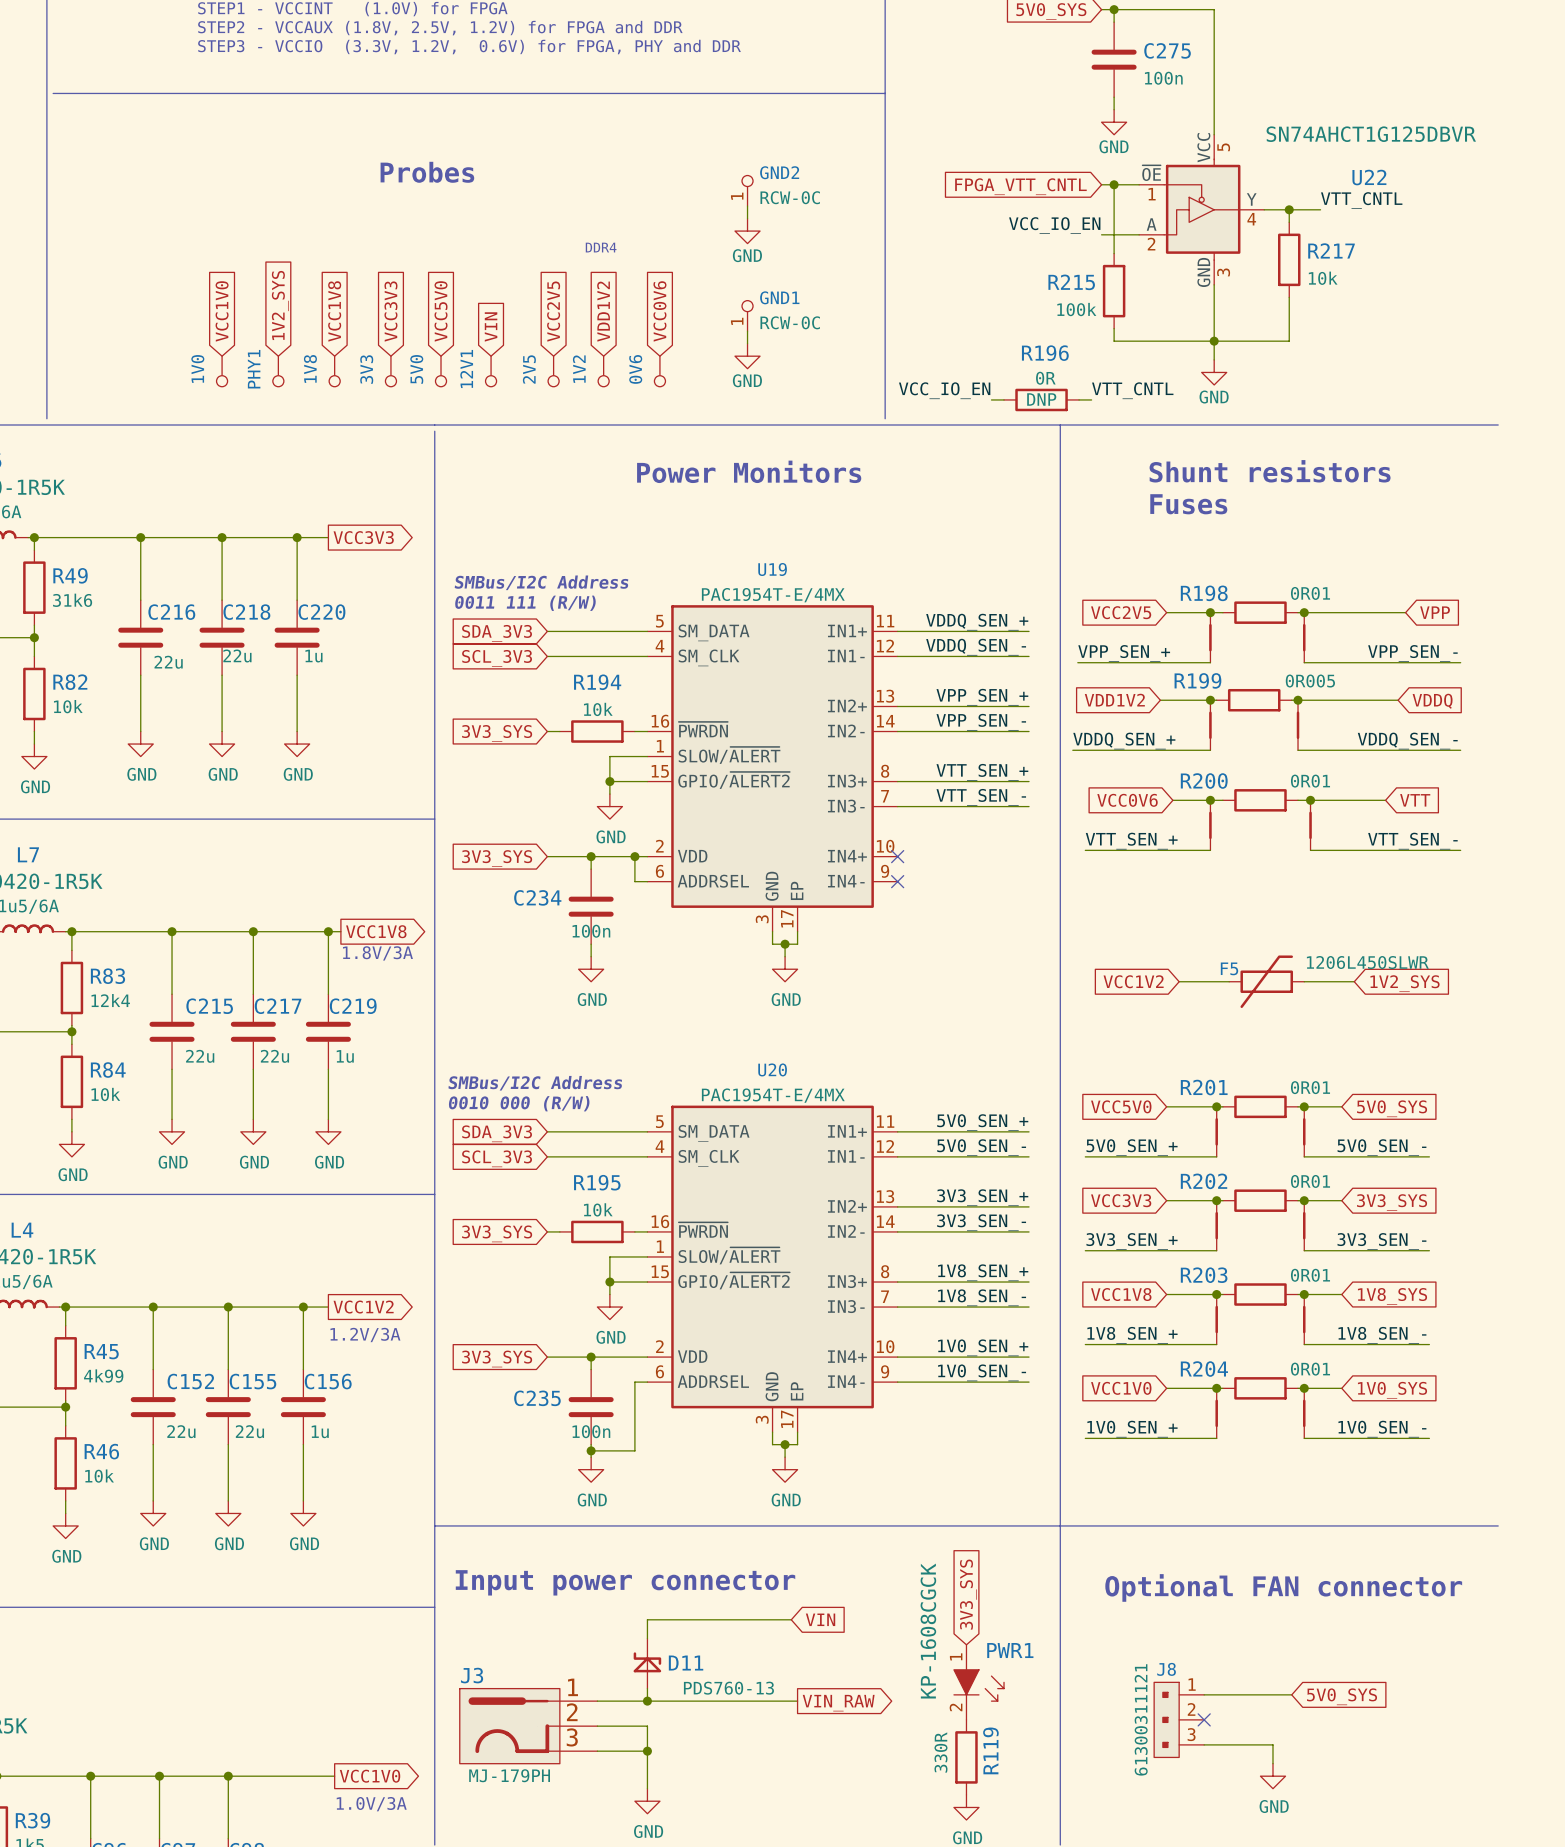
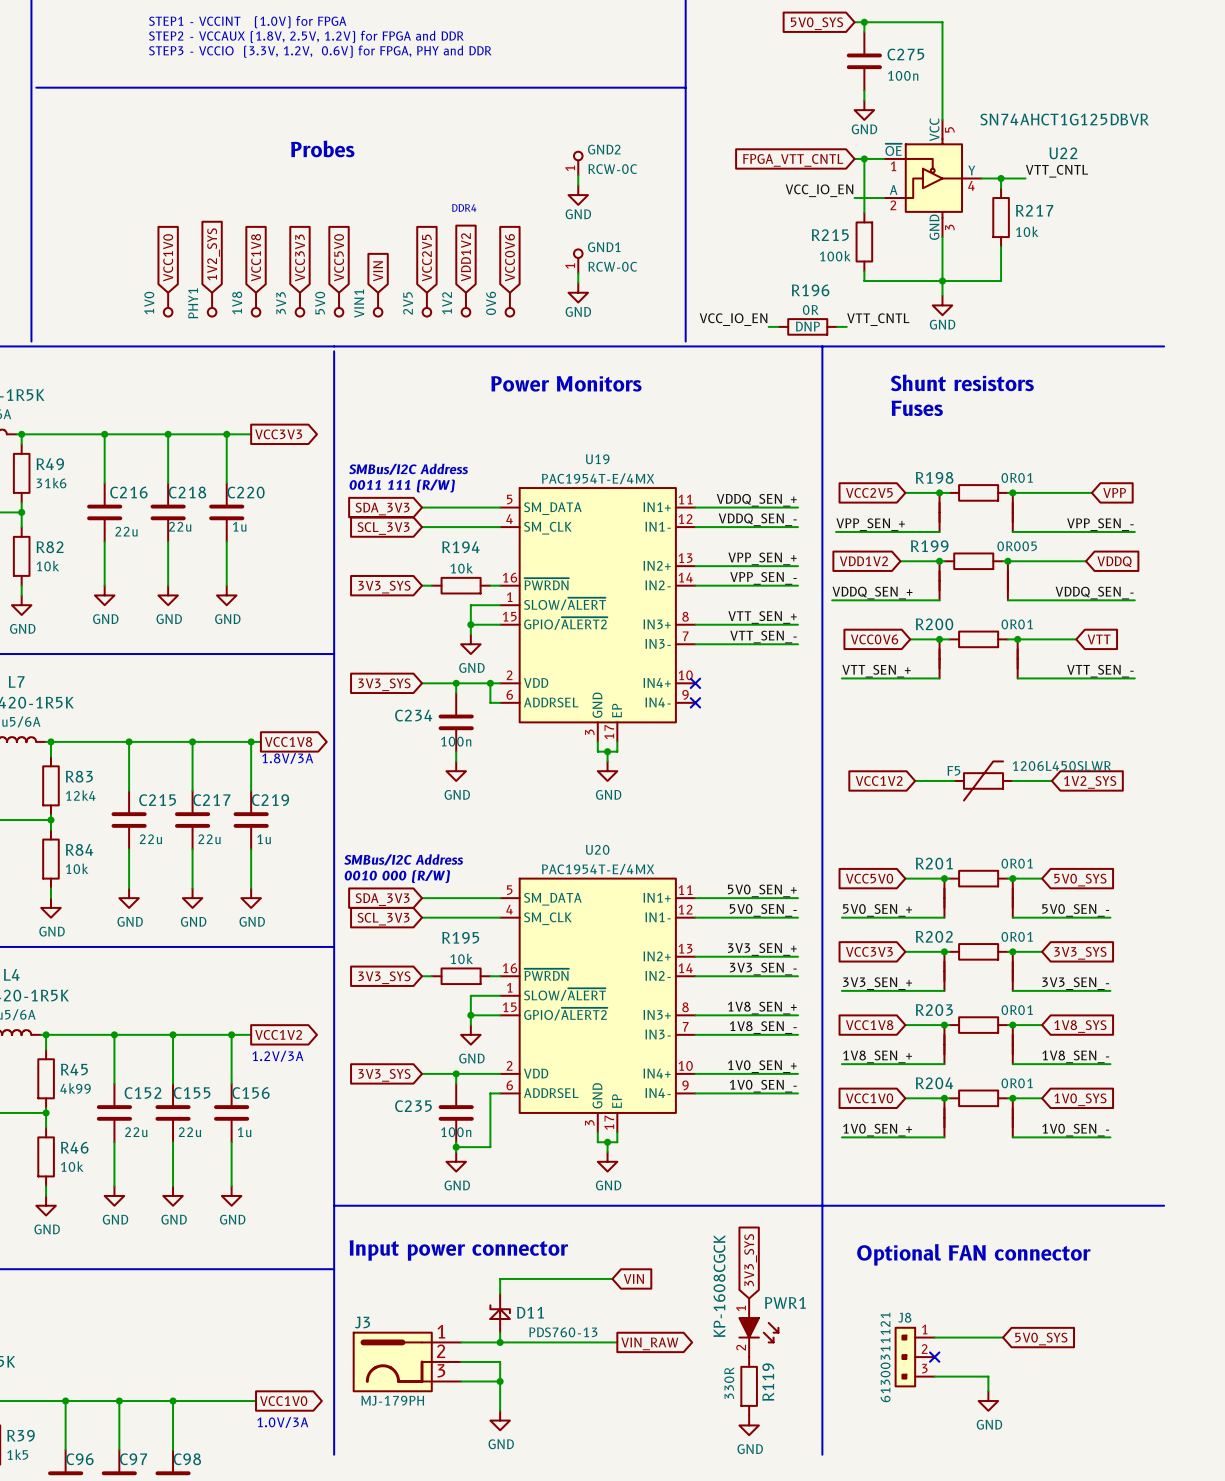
12V1 name: 12V1 (466, 369) -> VIN1 (359, 303)

